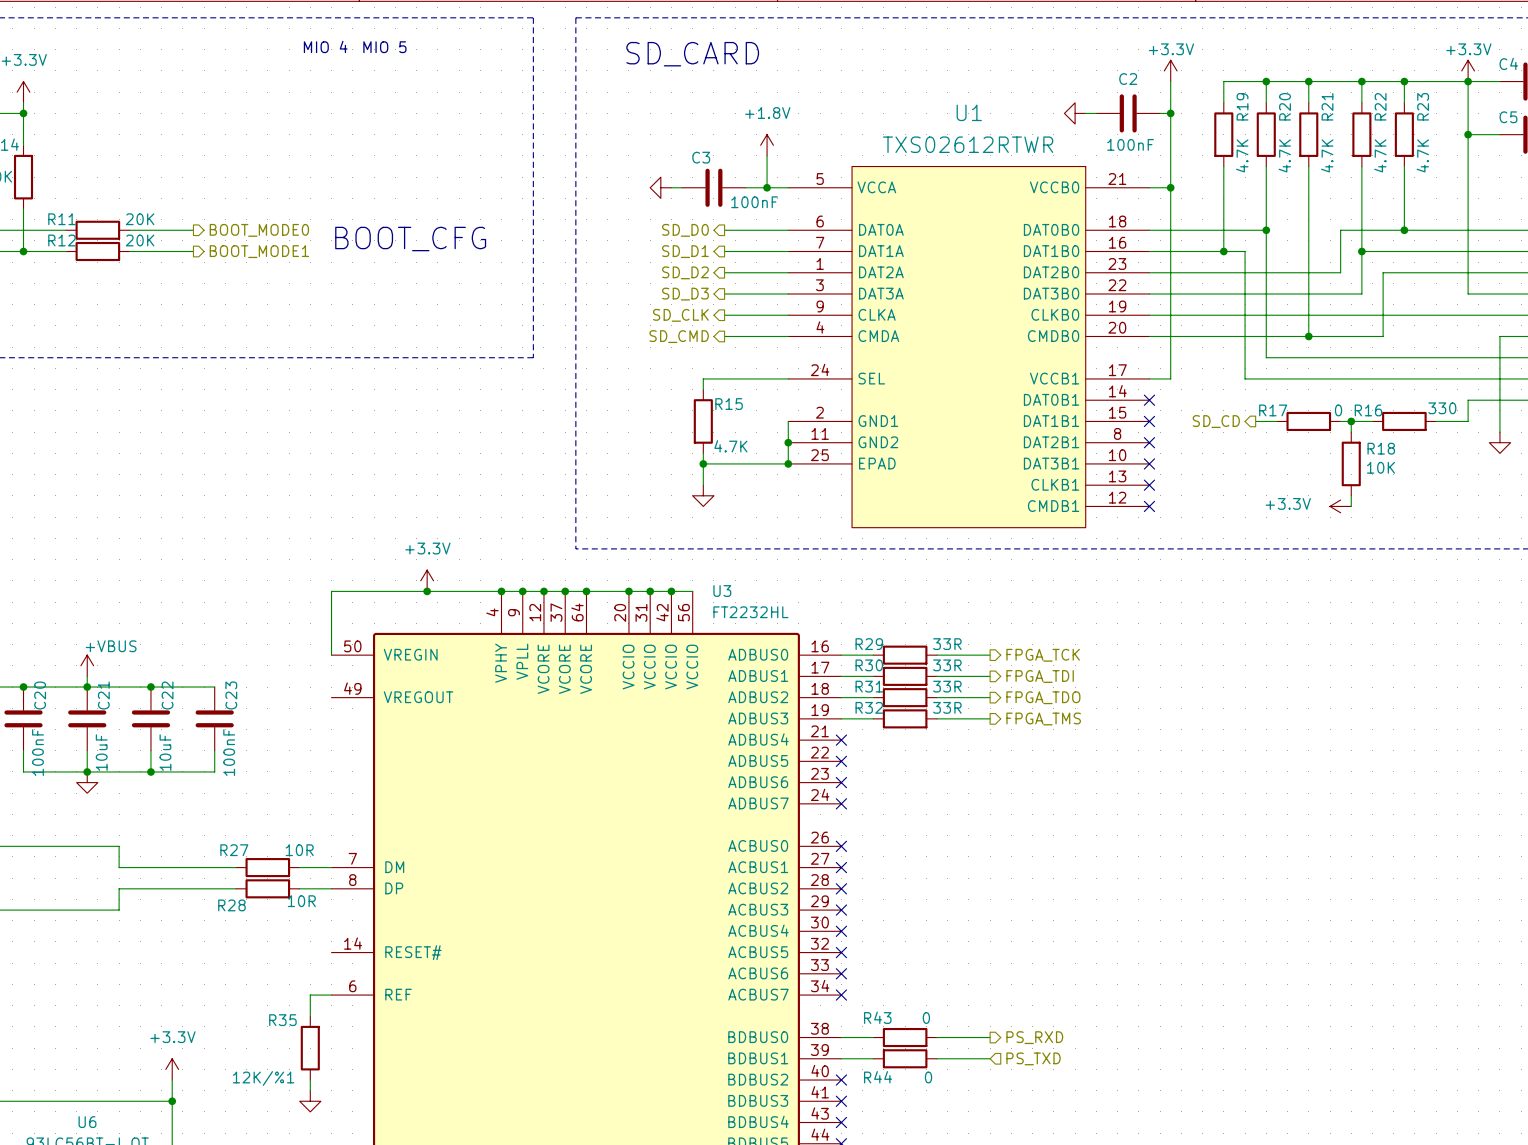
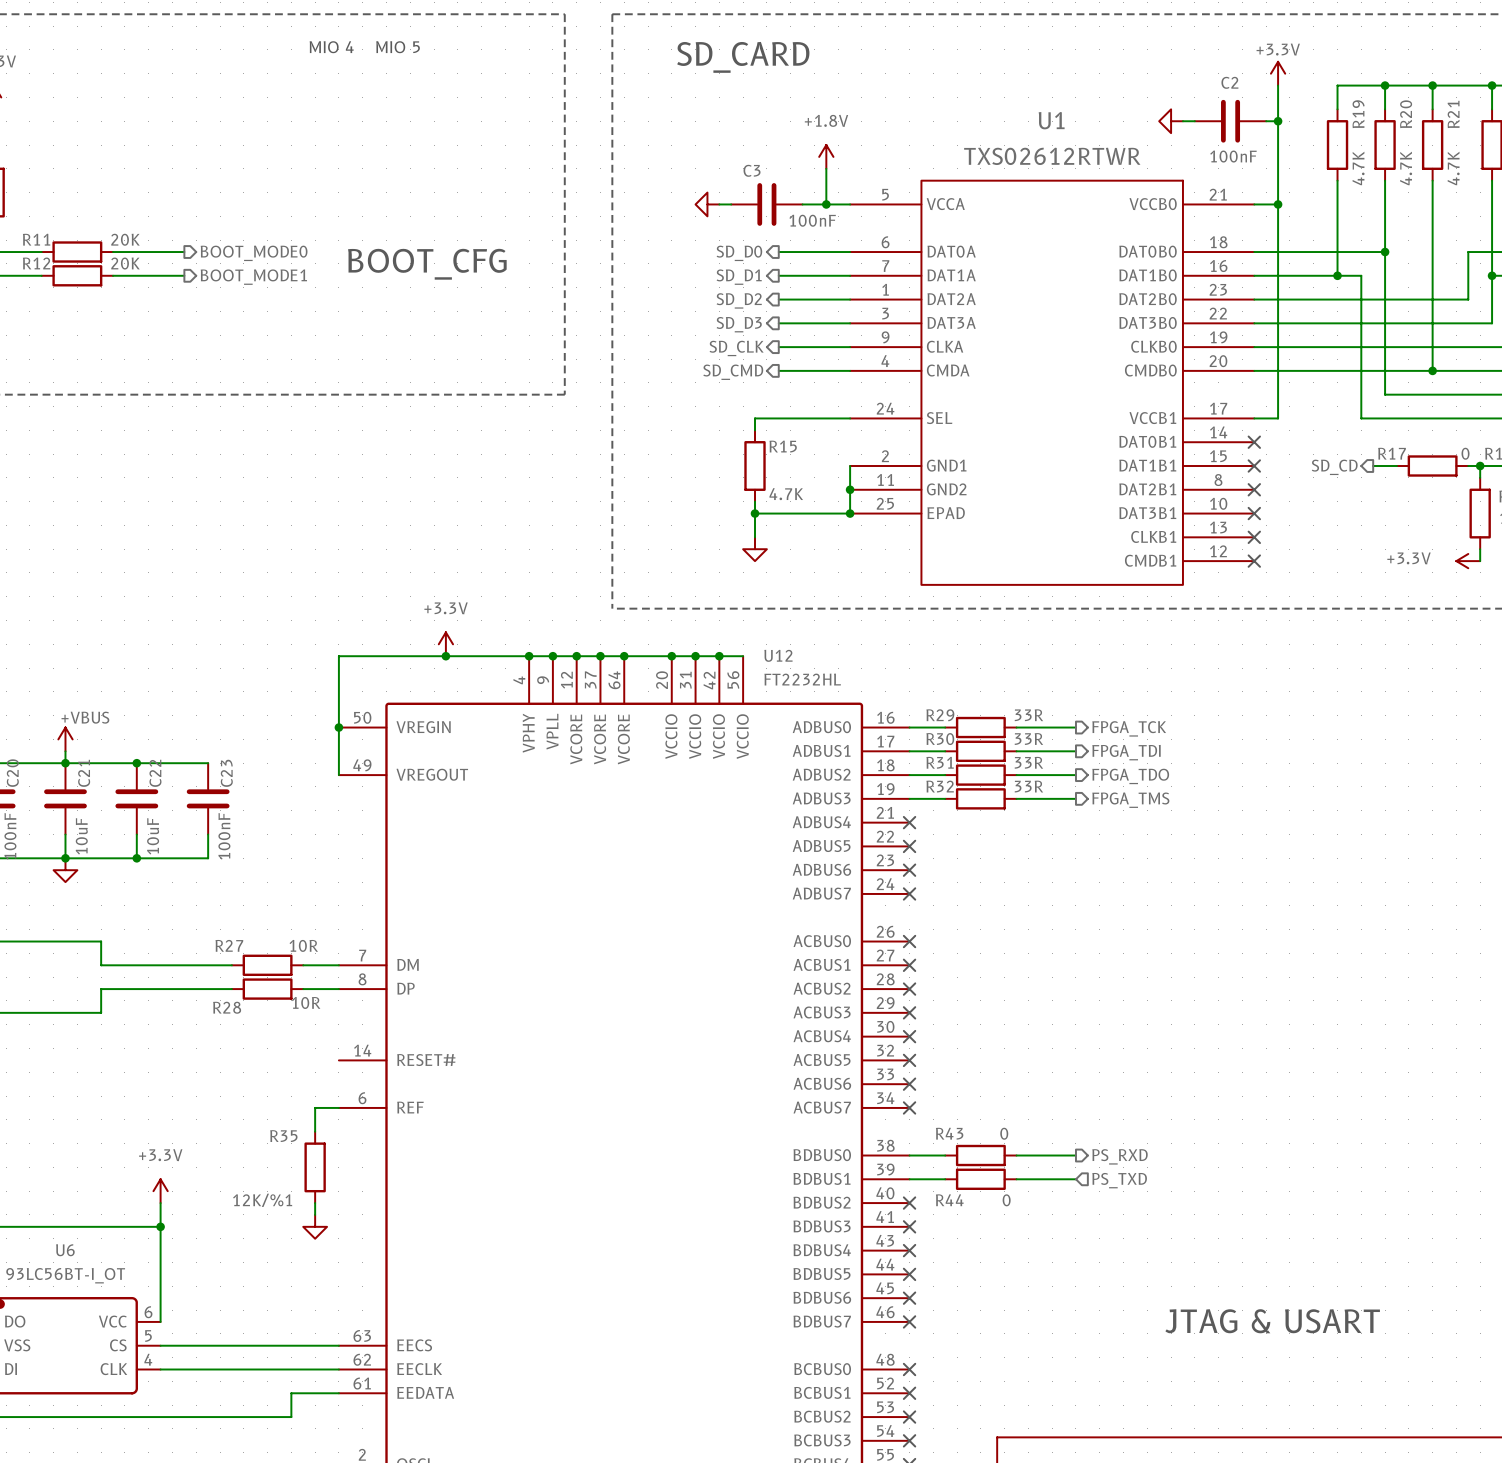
U3 name: U3 (722, 591) -> U12 (778, 655)
wire: none -> (338, 727) (338, 775)
junction: none -> (338, 727)

